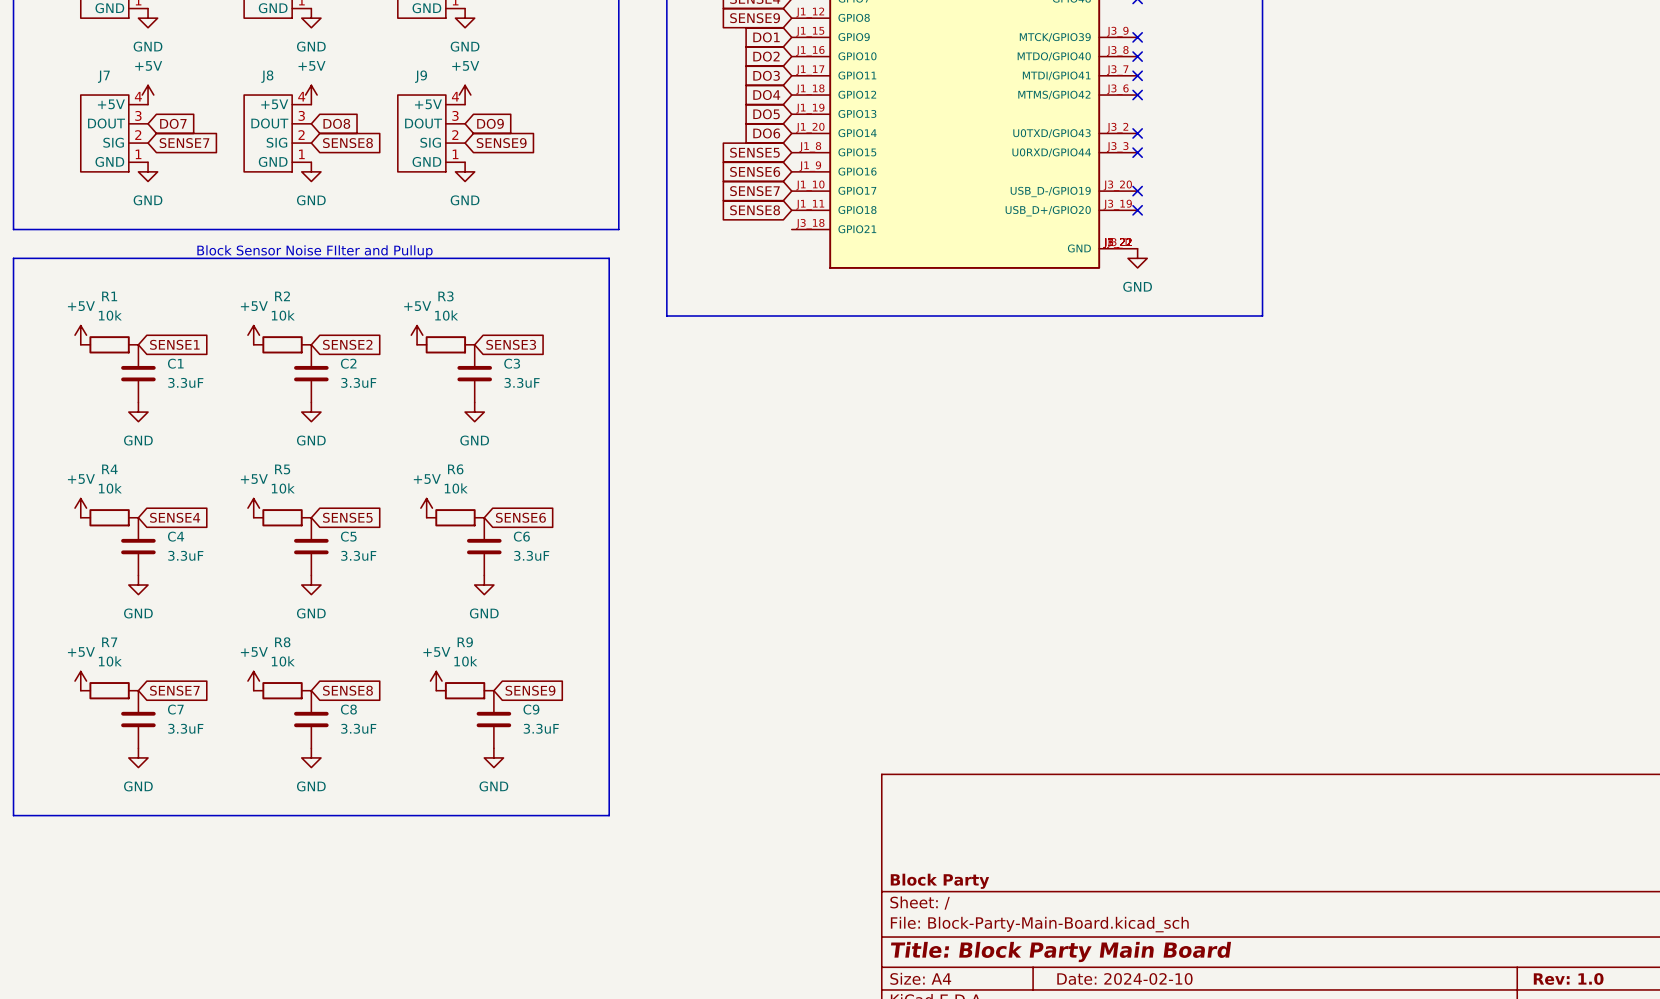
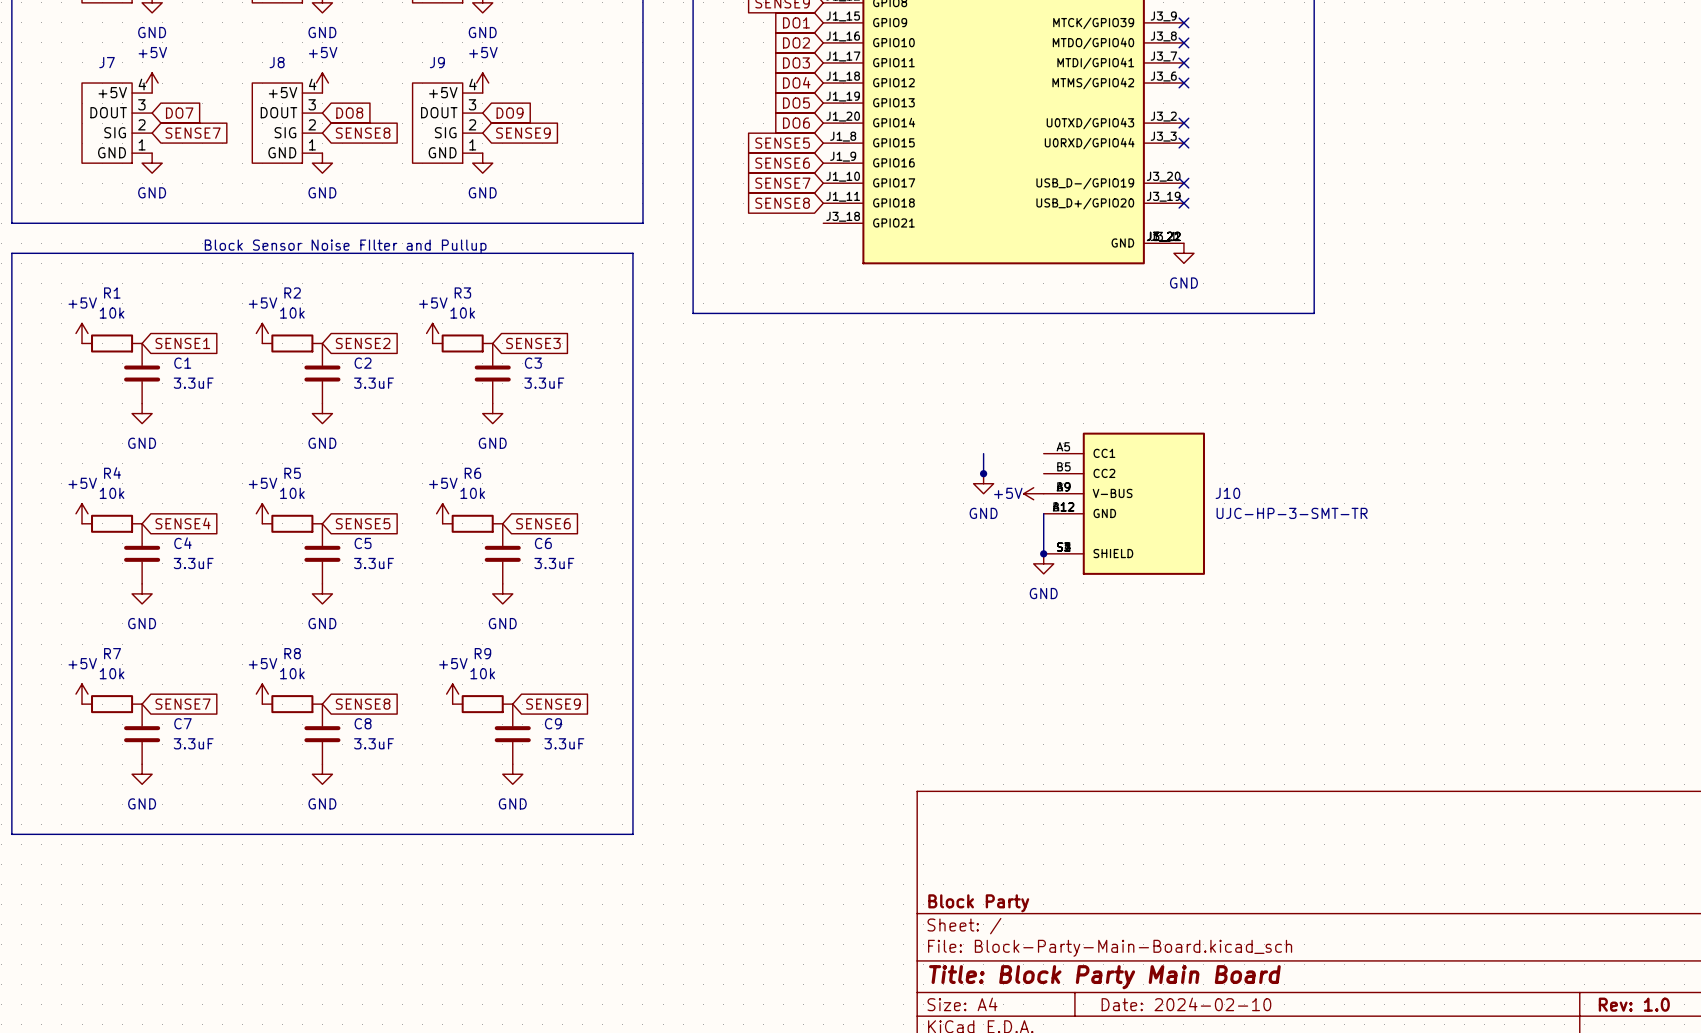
wire: none -> (983, 453) (983, 473)
junction: none -> (983, 473)
power symbol: none -> GND (983, 483)
power symbol: none -> +5V (1033, 493)
J10: none -> UJC-HP-3-SMT-TR (1124, 503)
wire: none -> (1043, 513) (1043, 553)
junction: none -> (1043, 553)
power symbol: none -> GND (1043, 563)

